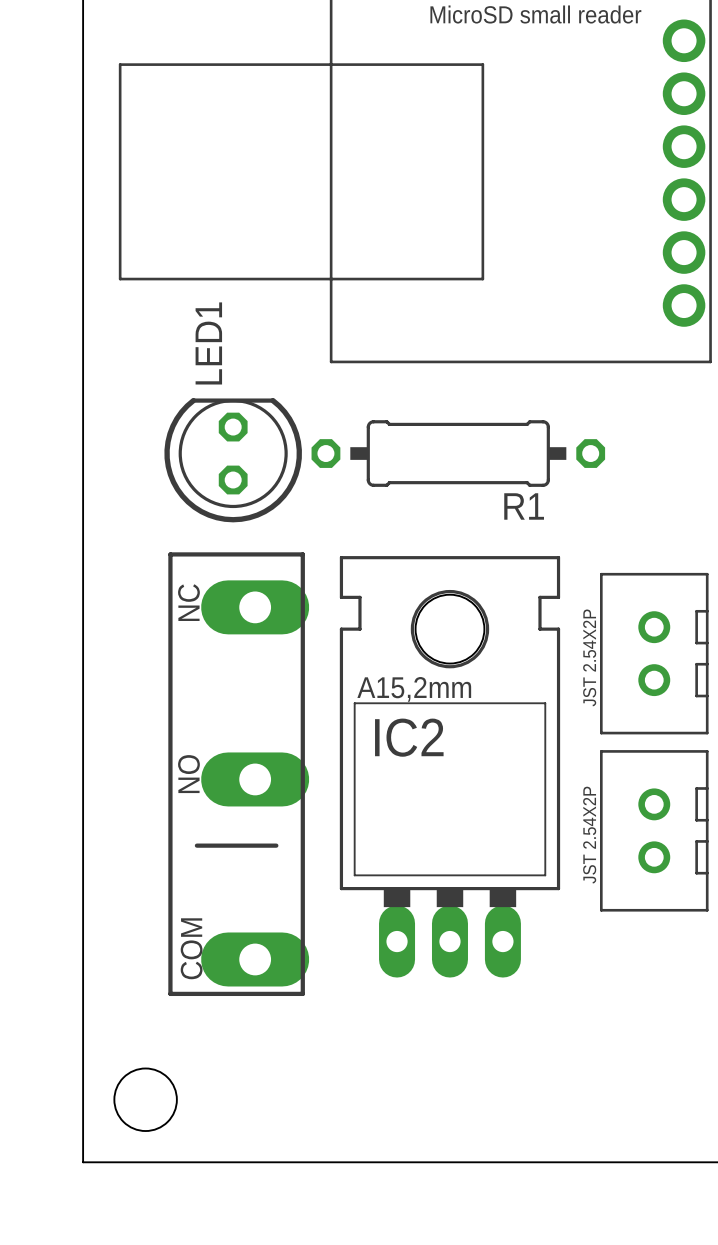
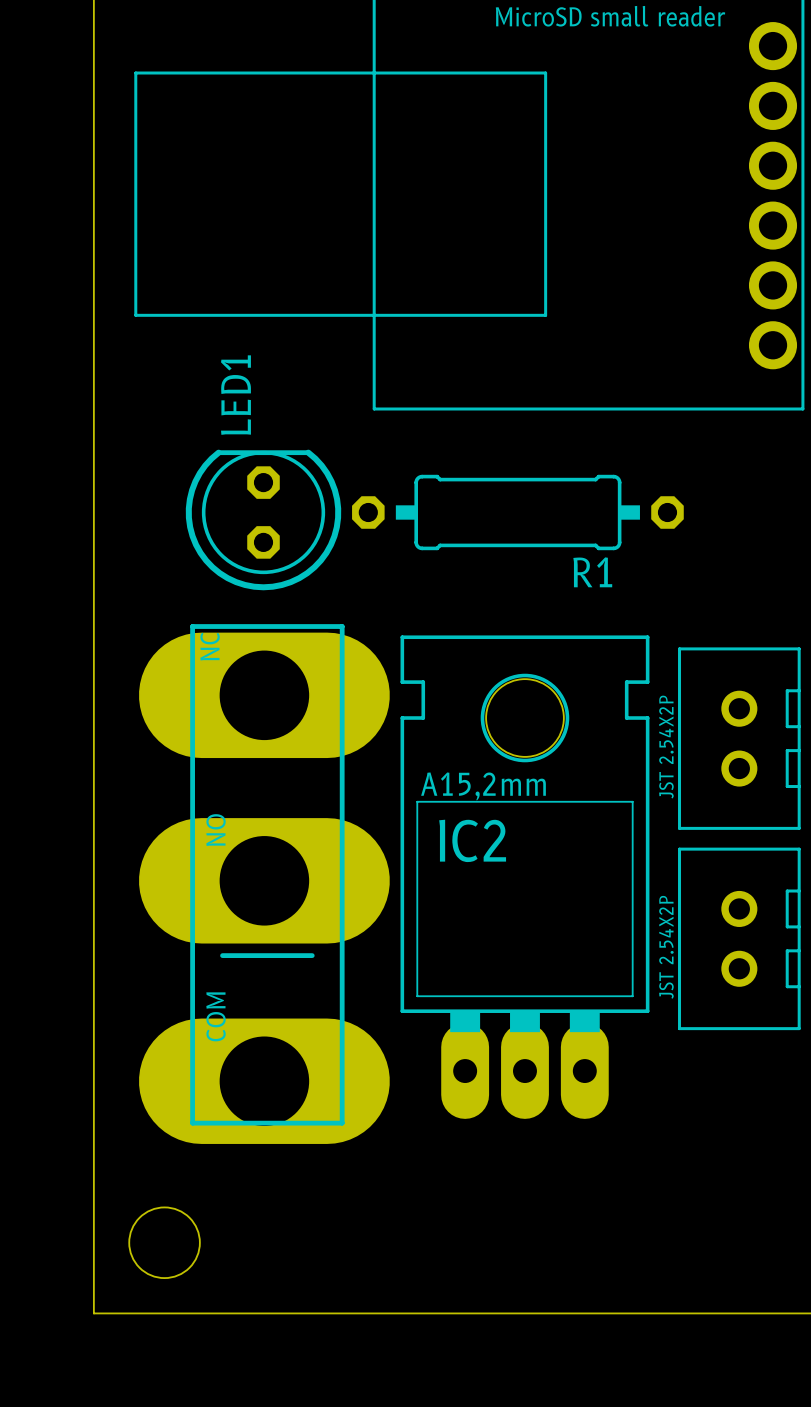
part footprint: [168, 552, 310, 997] -> [138, 624, 390, 1144]
IC2 footprint: [339, 556, 561, 978] -> [400, 635, 650, 1119]

